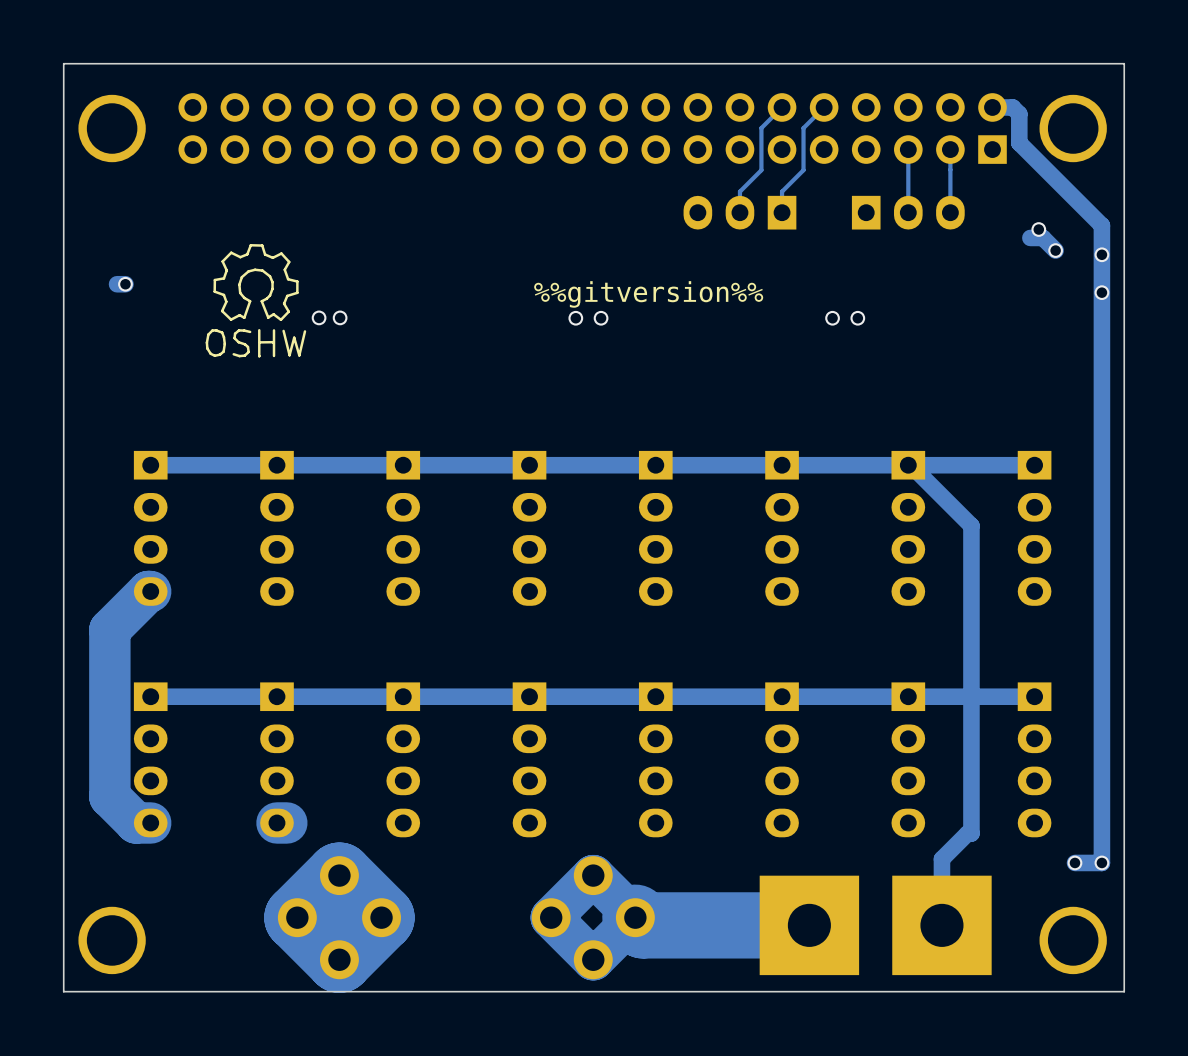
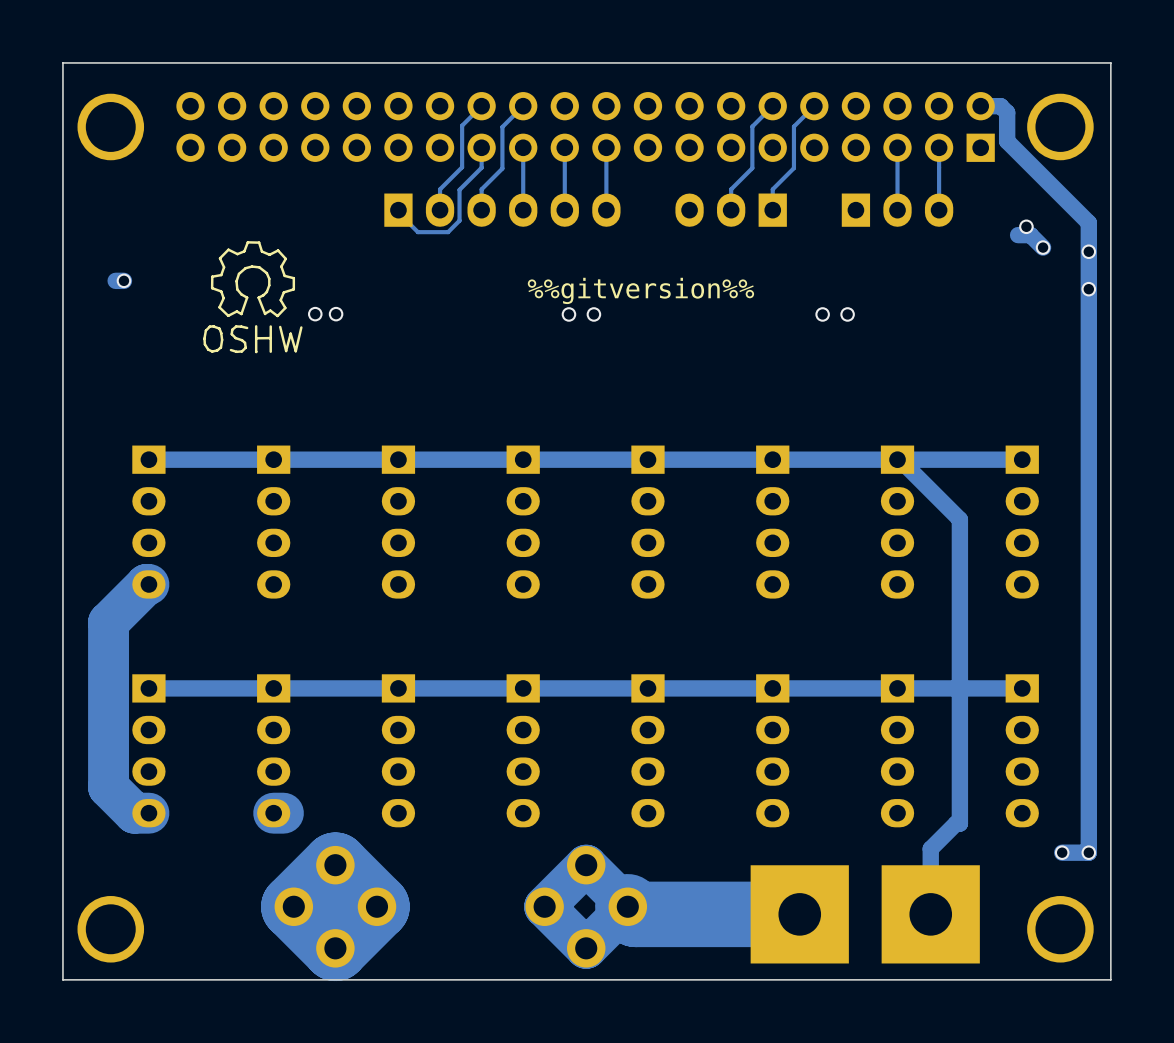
track: none -> (481, 106) (462, 125) (462, 167) (440, 189) (440, 210)
track: none -> (523, 106) (502, 126) (502, 168) (481, 189) (481, 210)
track: none -> (481, 147) (481, 167) (459, 189) (459, 220) (448, 232) (417, 232) (398, 212) (398, 210)
track: none -> (523, 147) (523, 210)
track: none -> (564, 147) (564, 210)
track: none -> (606, 147) (606, 210)
part: none -> (502, 210)

